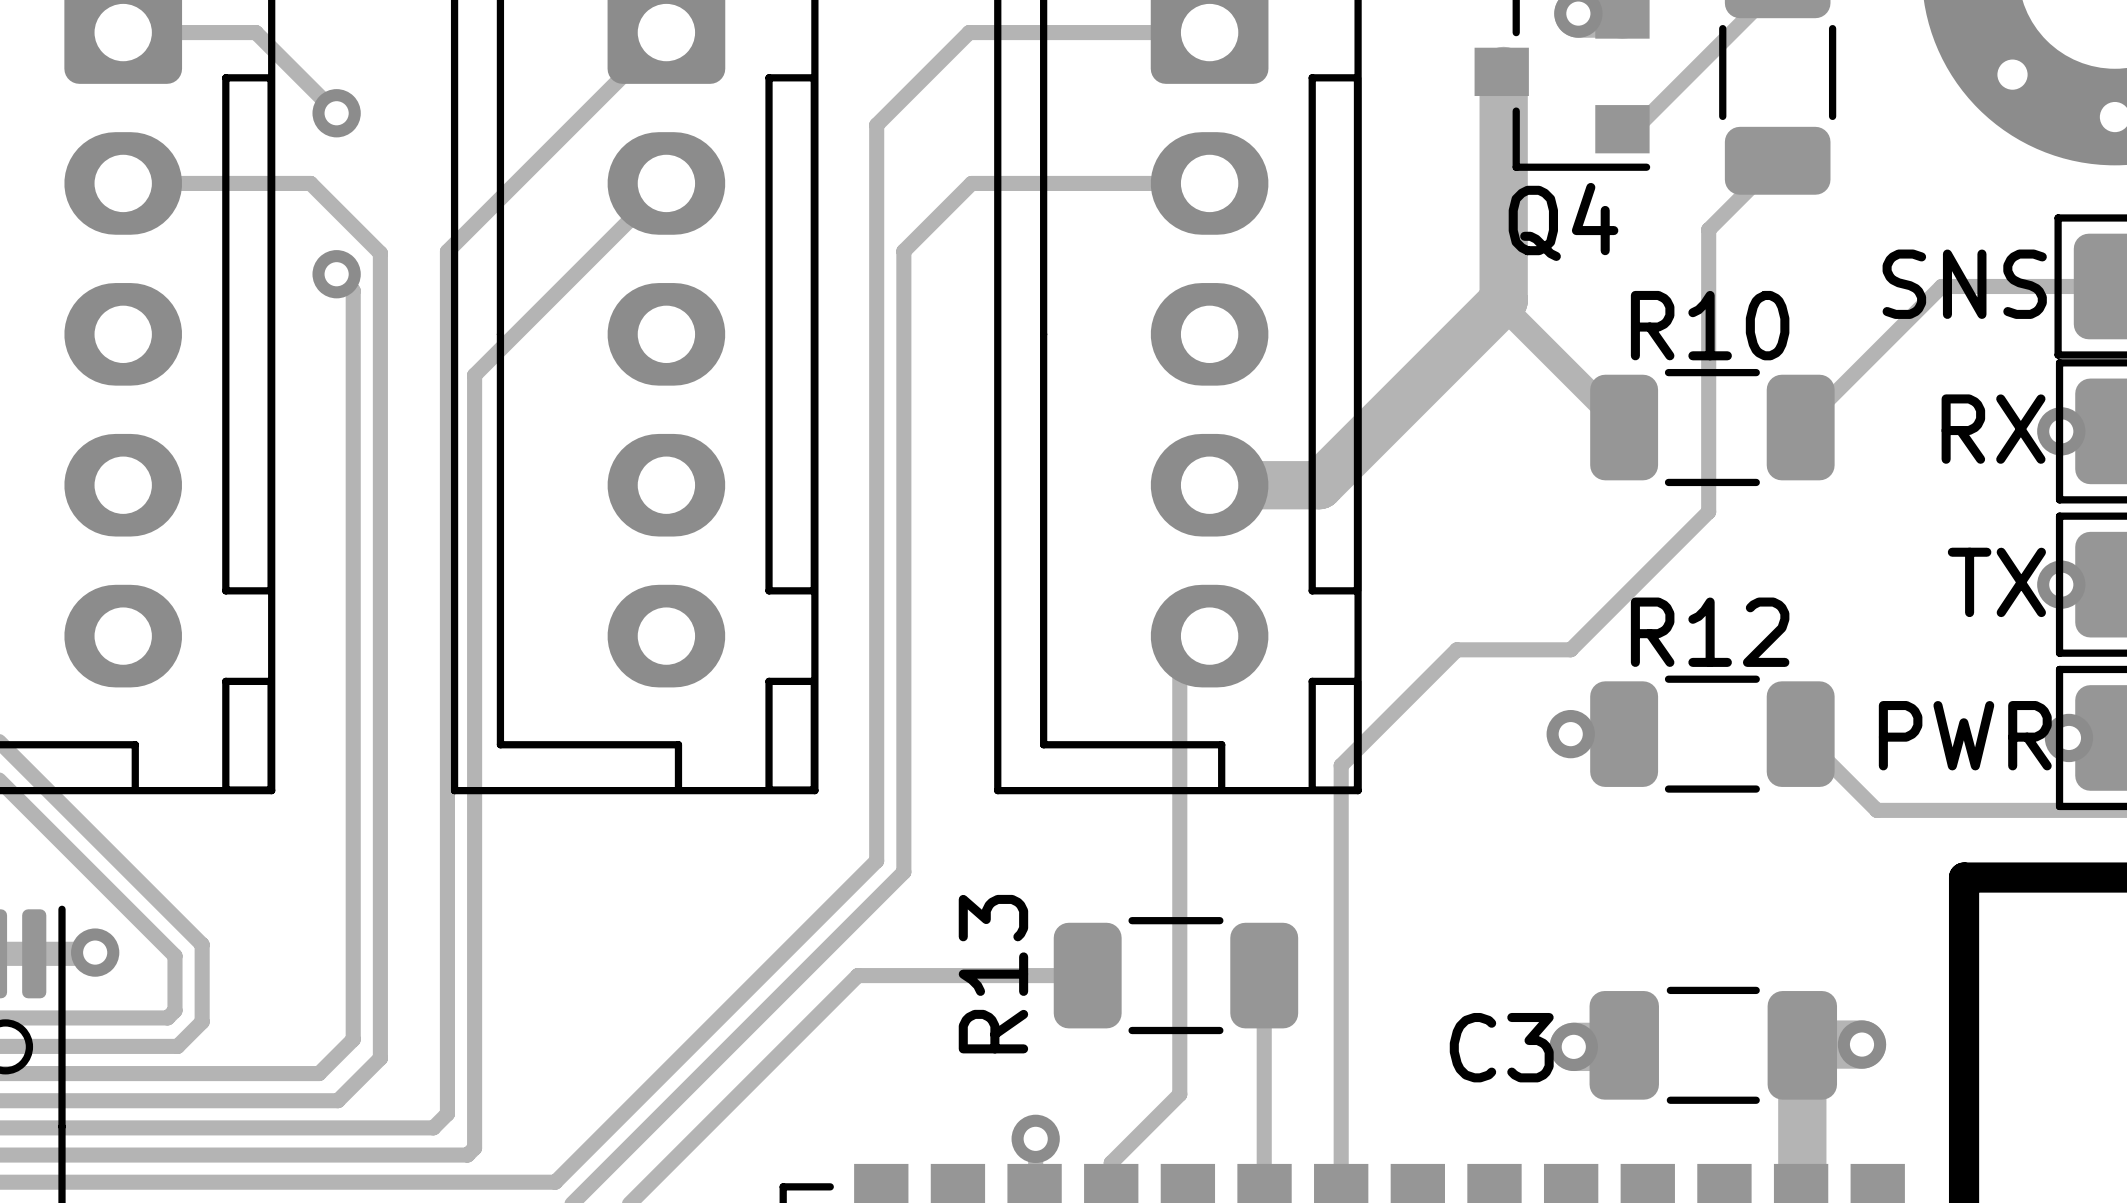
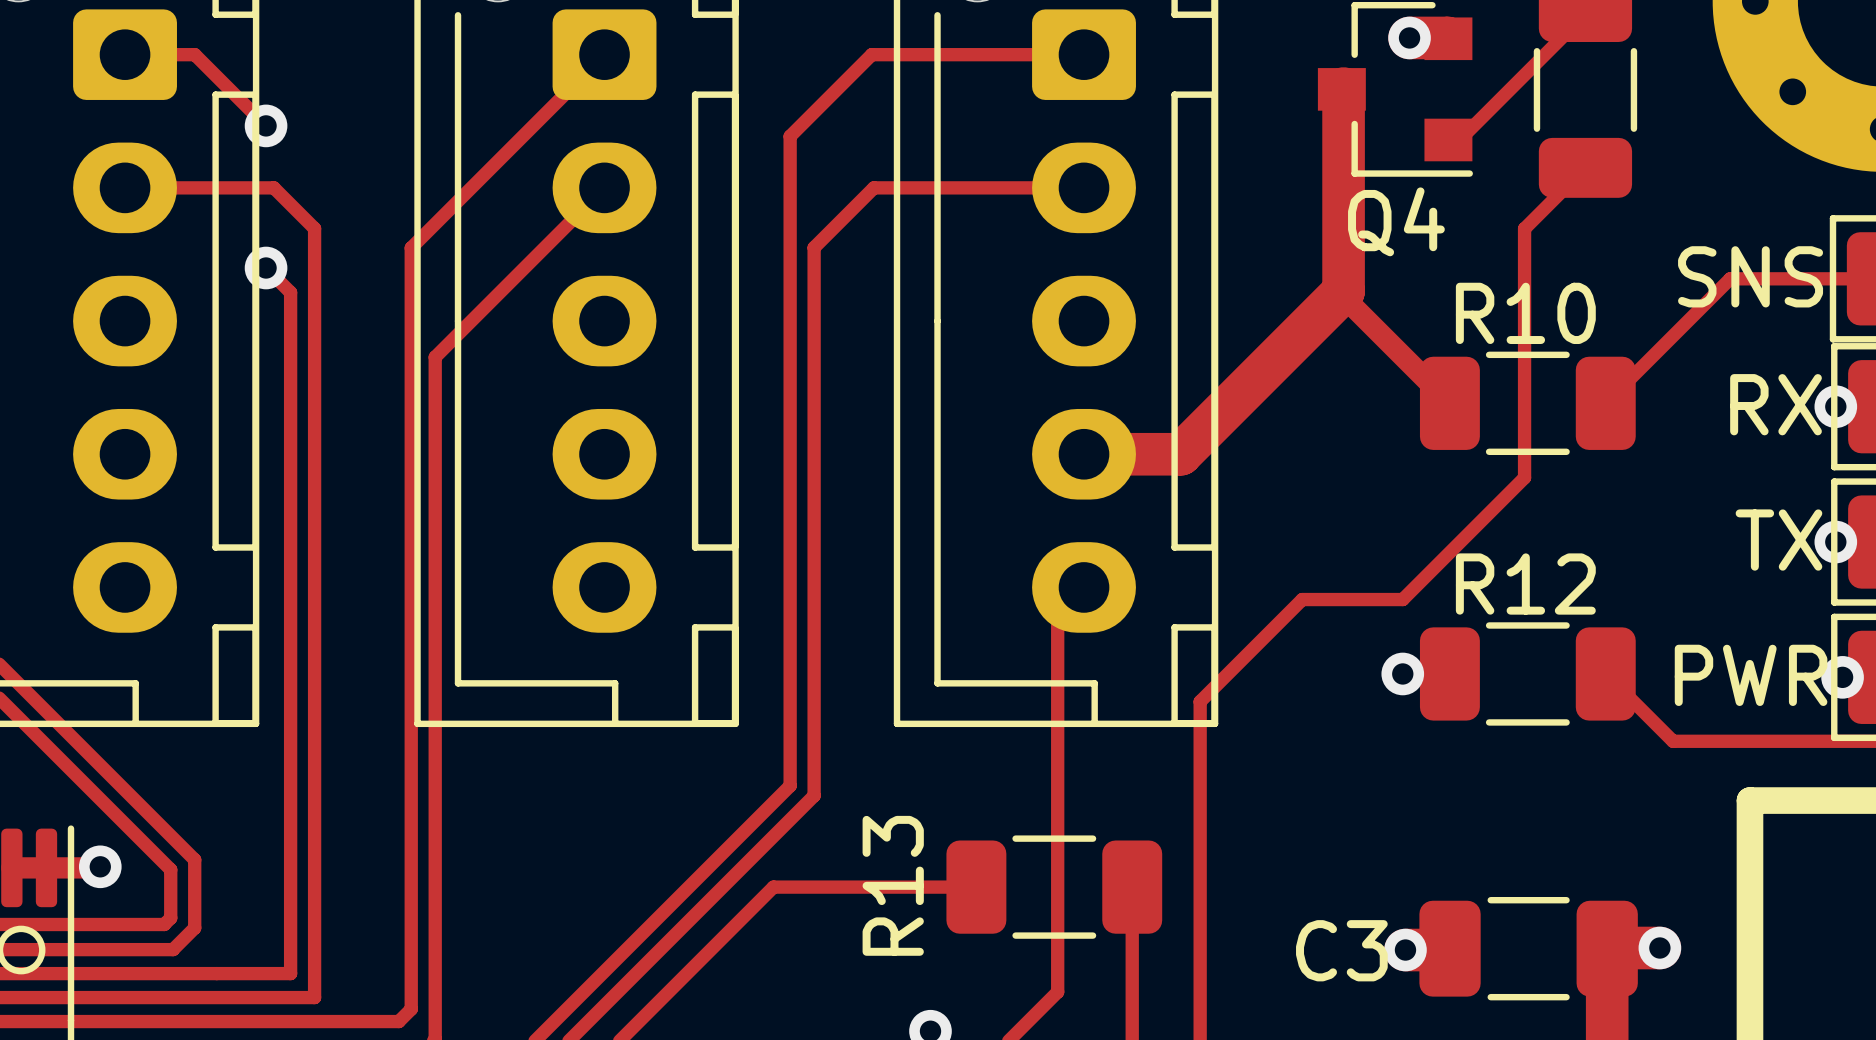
track: (202, 32) (255, 32) (336, 113) -> (194, 54) (266, 125)
via position: (336, 113) -> (266, 125)
track: (291, 183) (310, 183) (380, 253) (380, 1058) (337, 1100) -> (273, 187) (314, 228) (314, 997)
track: (336, 274) (353, 290) (353, 1039) (319, 1073) (310, 1073) -> (266, 268) (290, 292) (290, 973)
via position: (336, 274) -> (266, 268)

